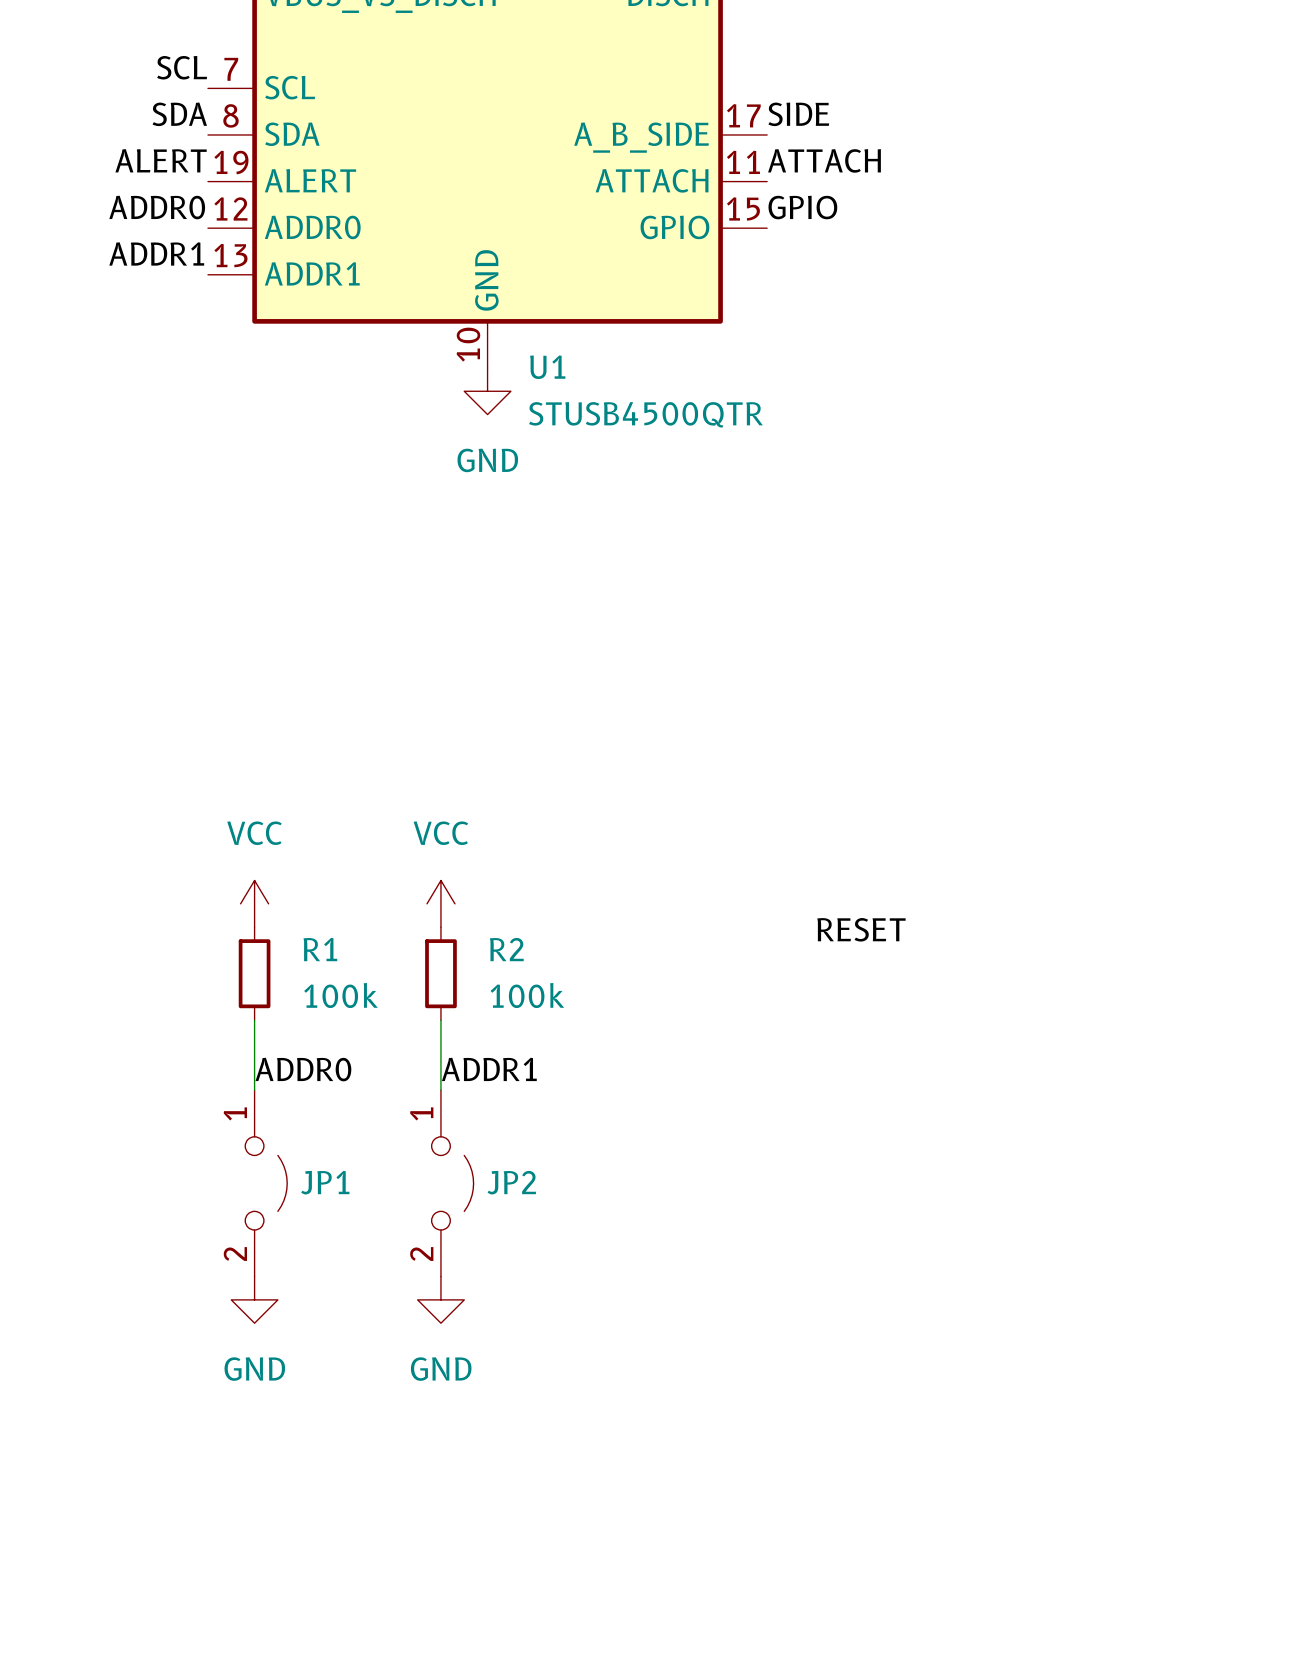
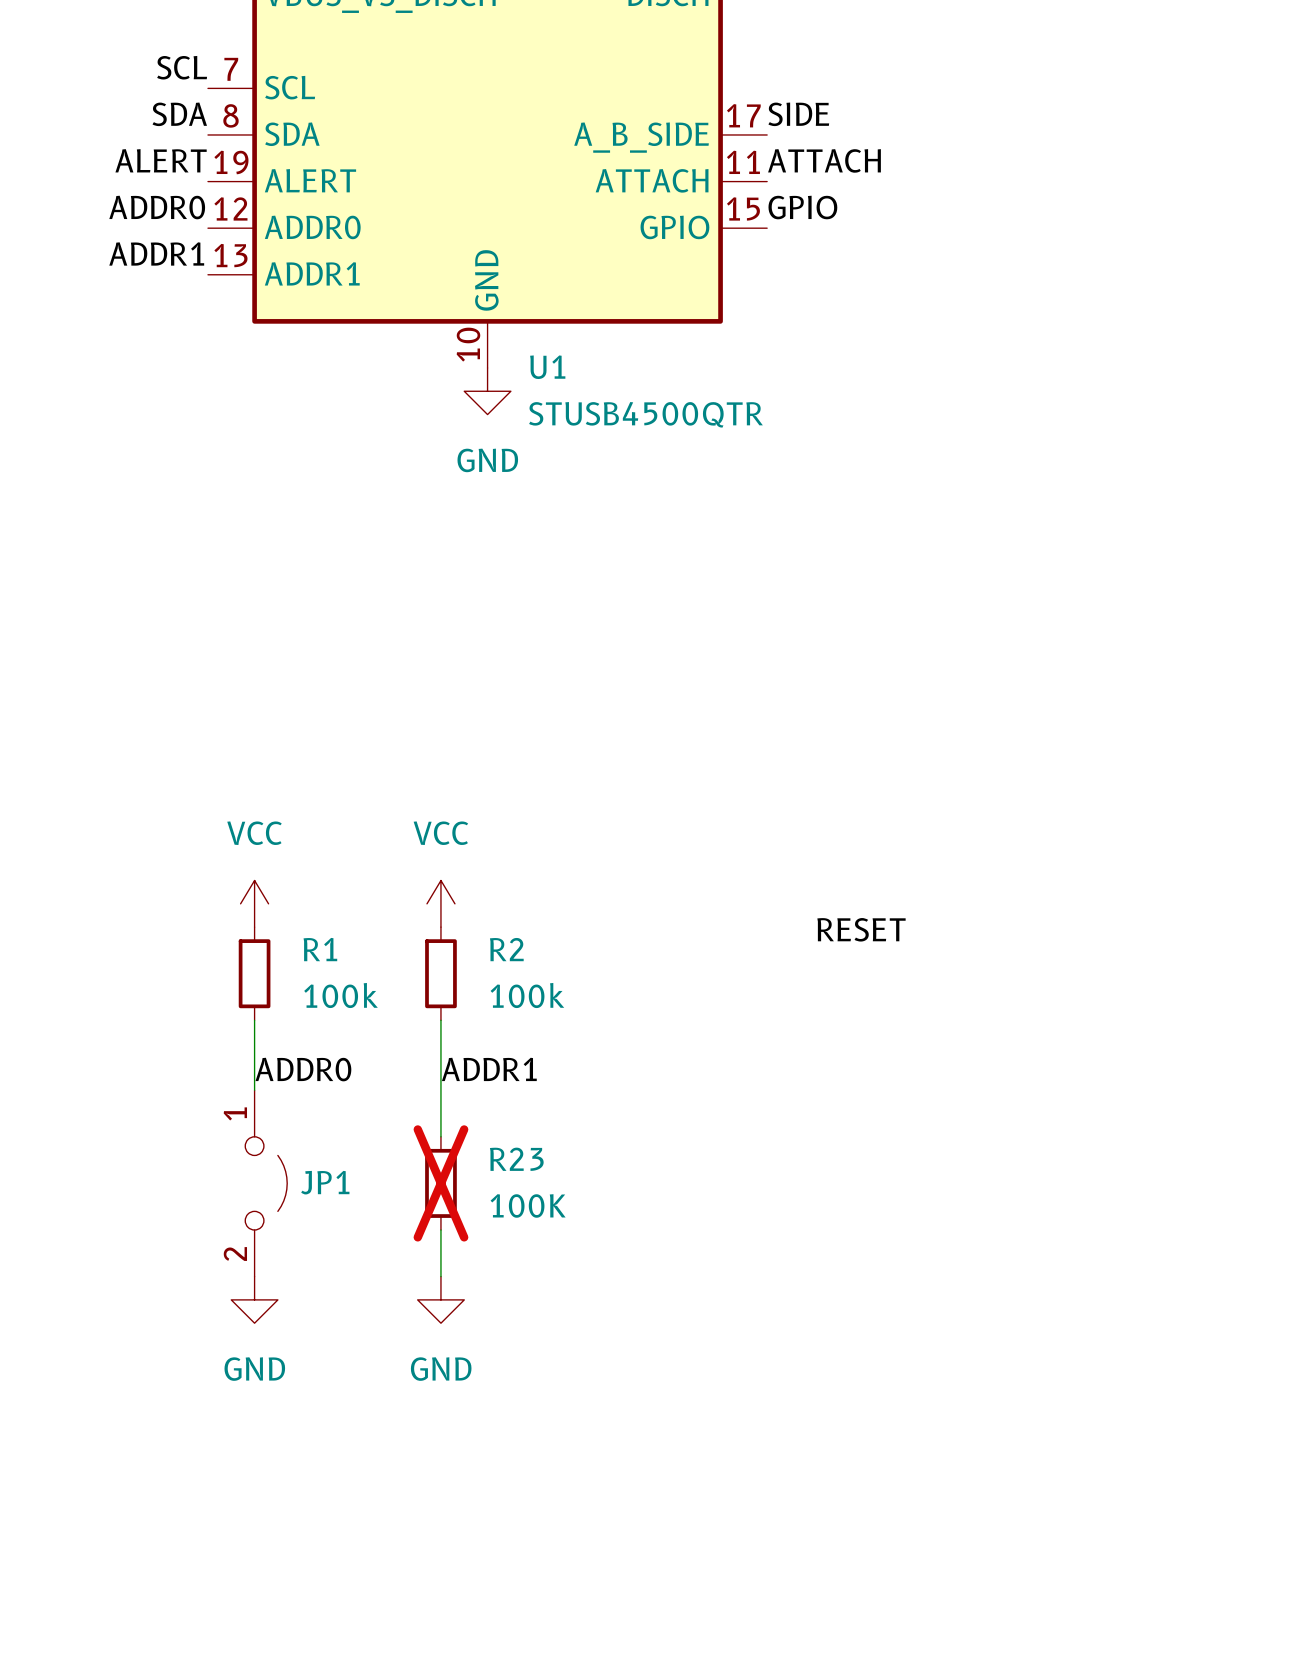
R23: none -> 100K (440, 1183)
JP2: (452, 1183) -> none

